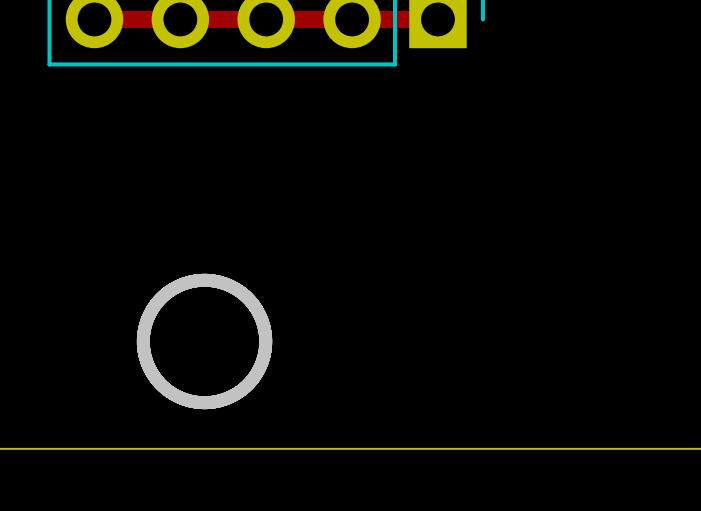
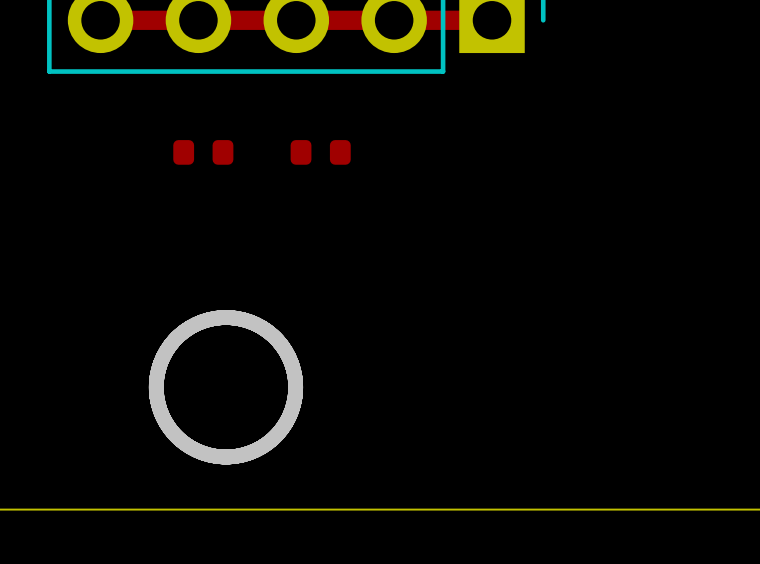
part: none -> (203, 152)
part: none -> (320, 152)

